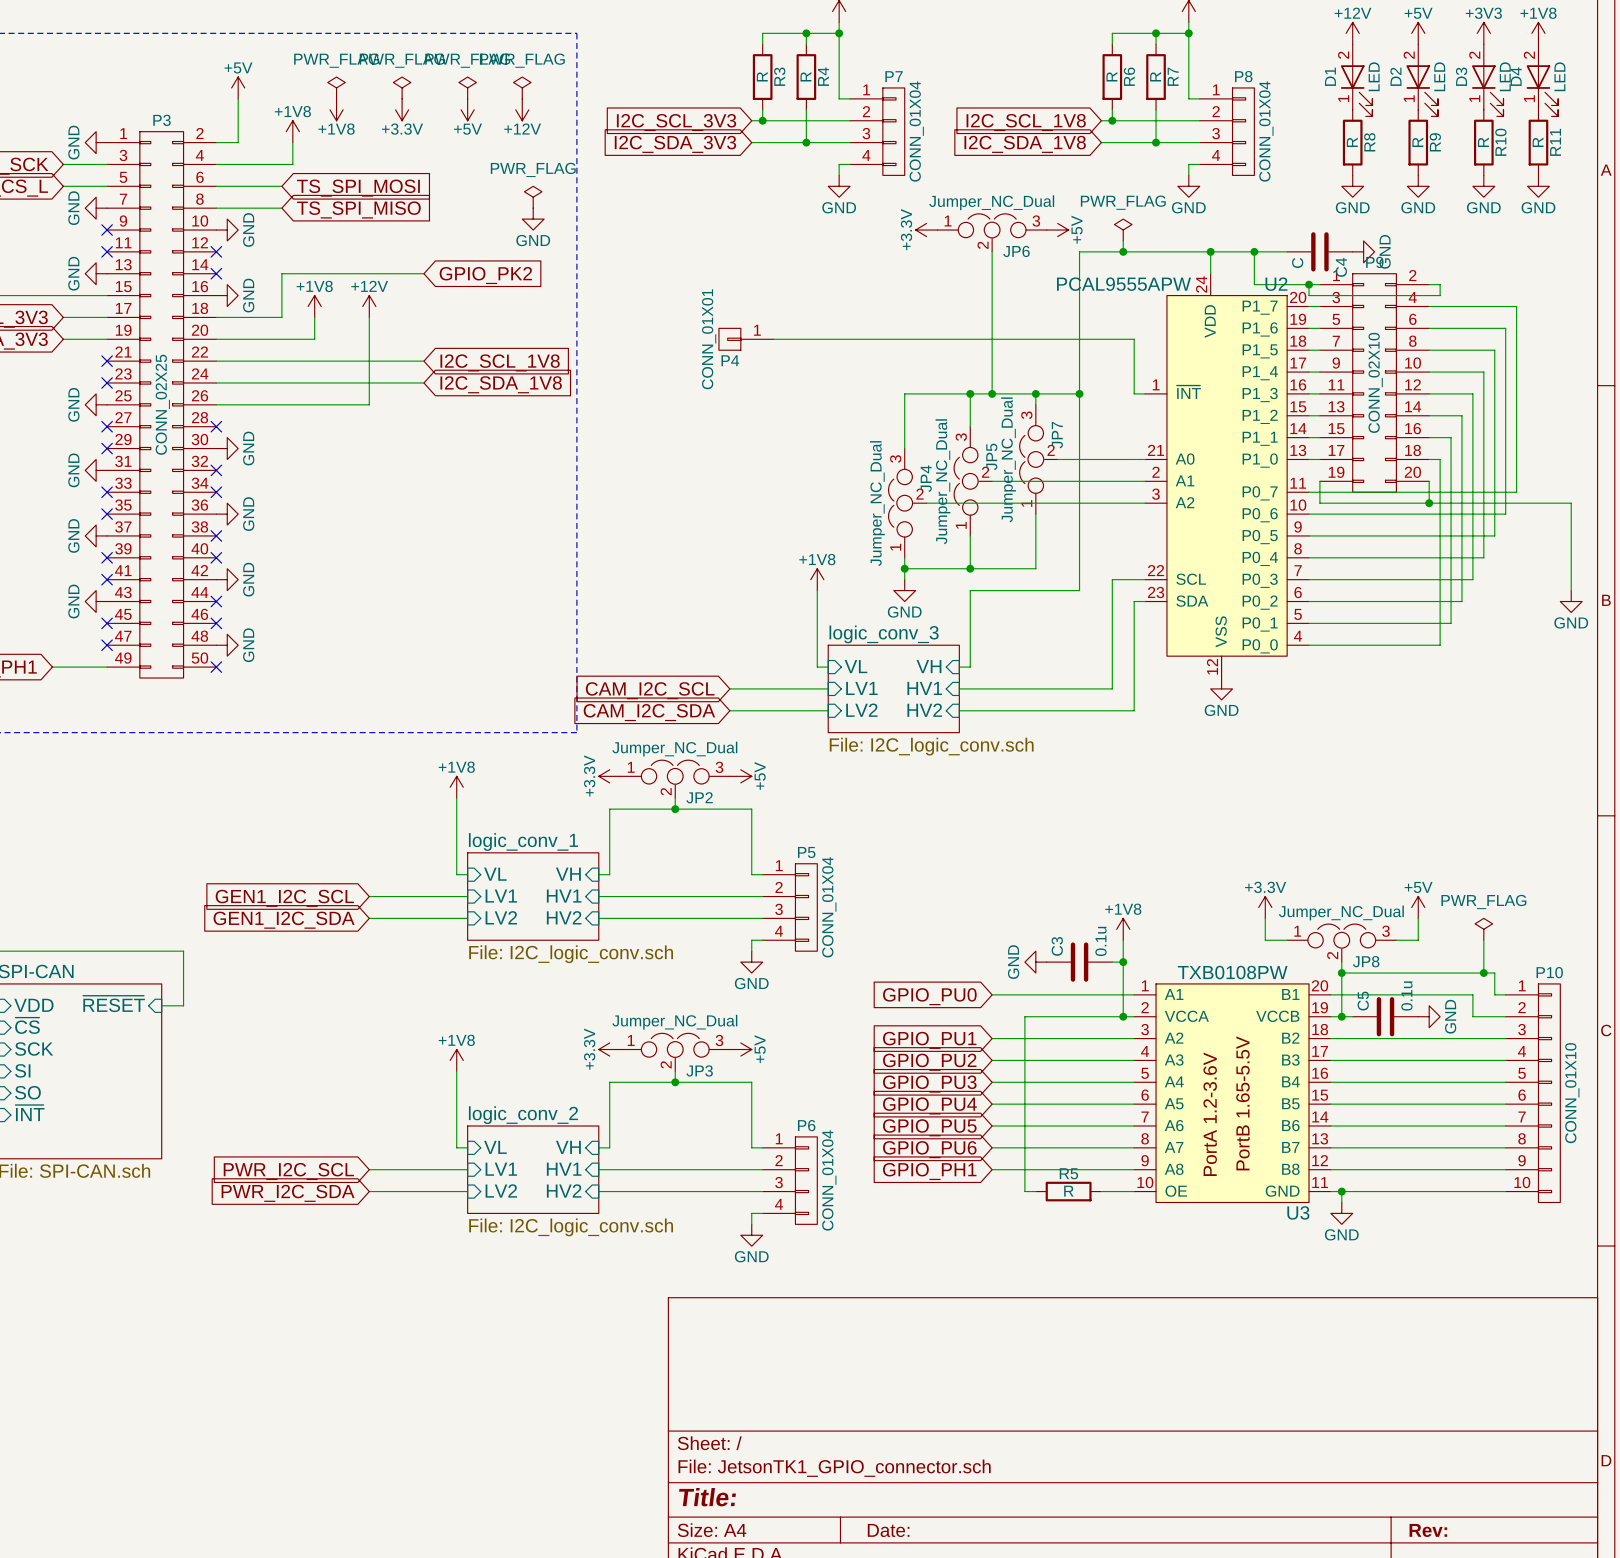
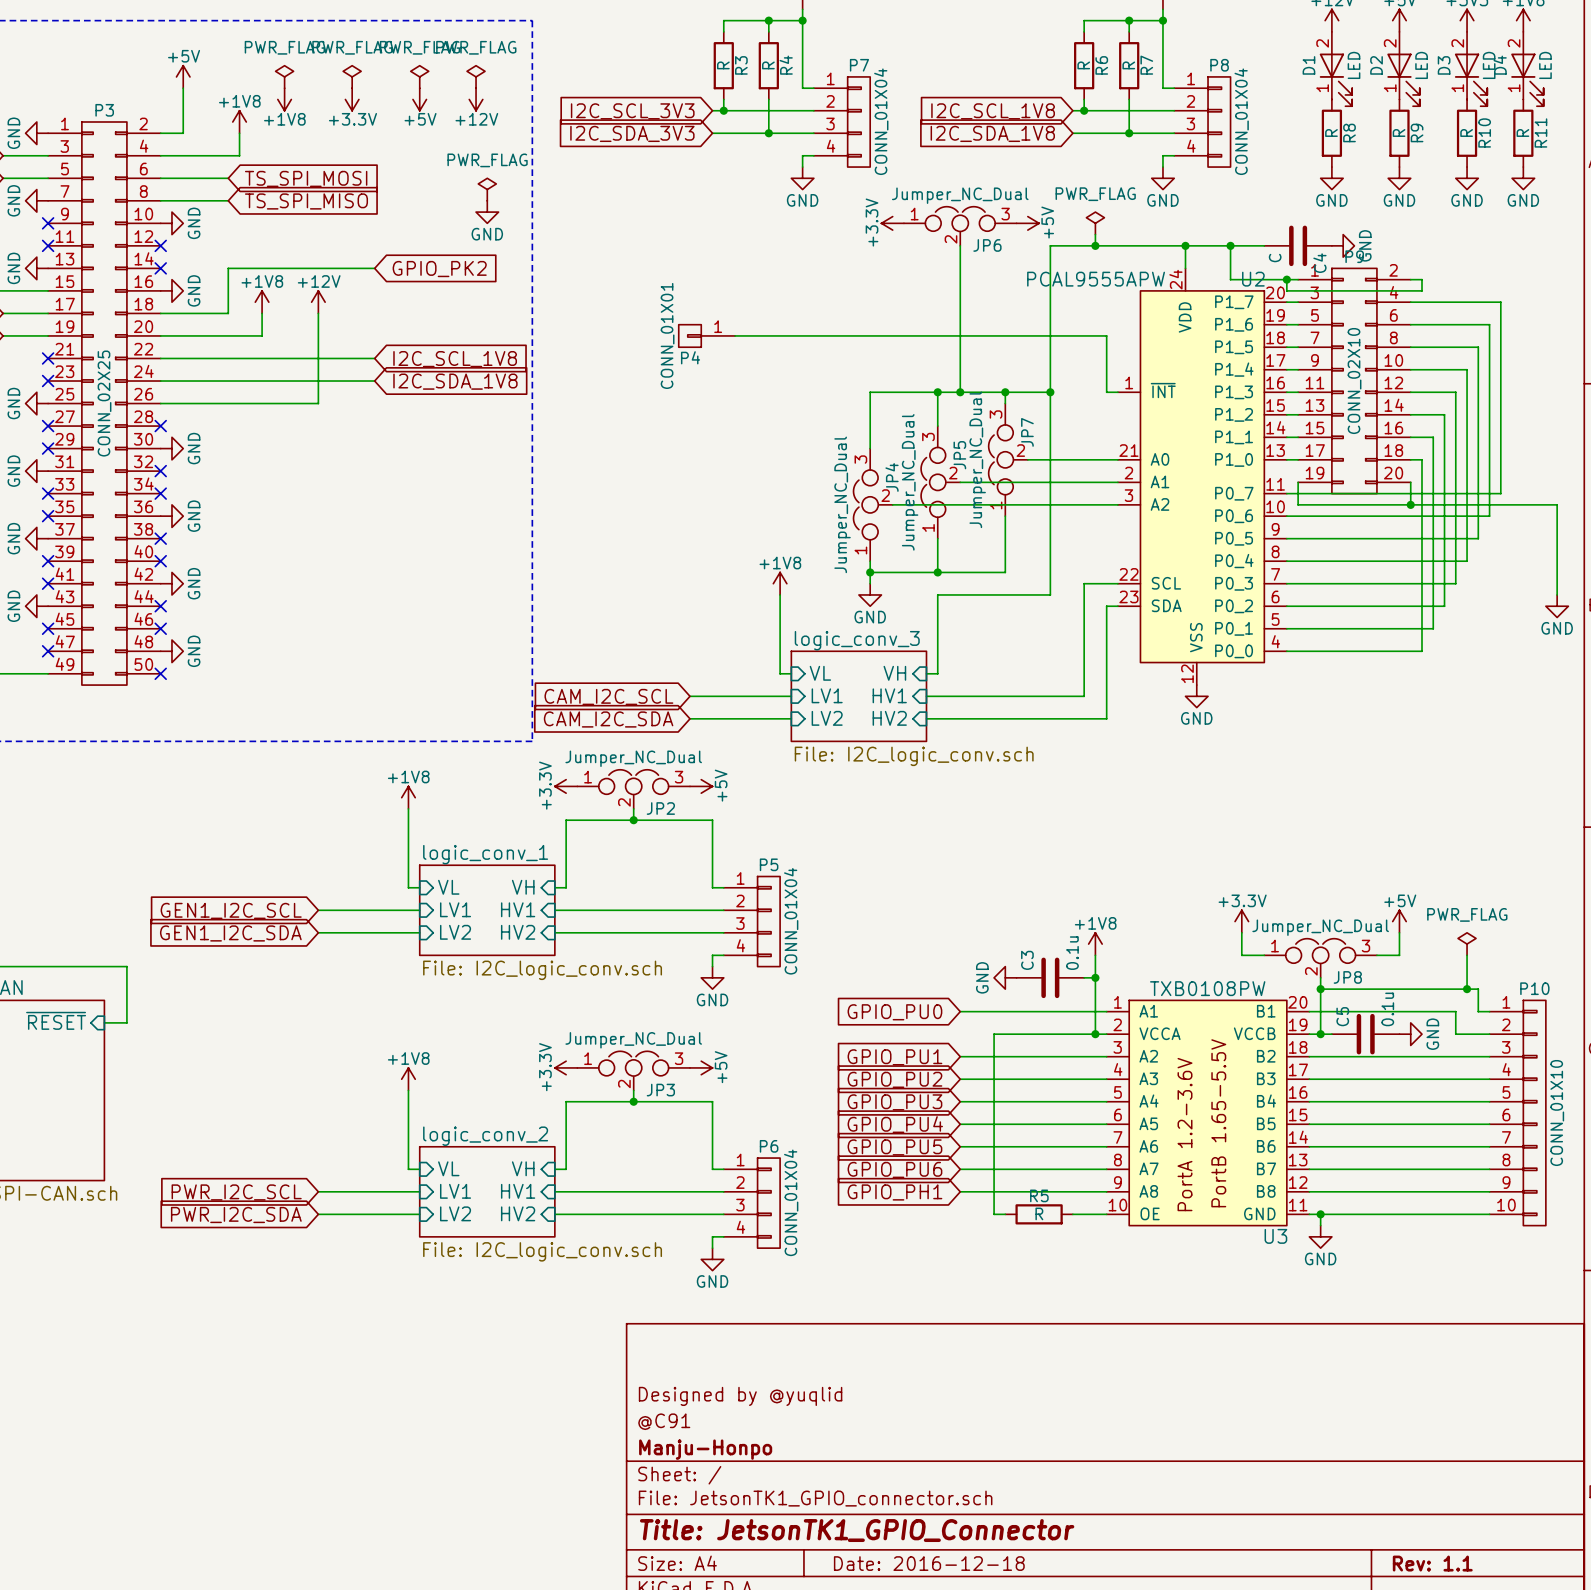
title block: none -> Designed by @yuqlid (740, 1396)
title block: none -> @C91 (664, 1421)
title block: none -> Manju-Honpo (705, 1449)
title block: Title: (707, 1497) -> Title: JetsonTK1_GPIO_Connector (857, 1530)
title block: Date: (888, 1530) -> Date: 2016-12-18 (929, 1563)
title block: Rev: (1428, 1530) -> Rev: 1.1 (1432, 1563)

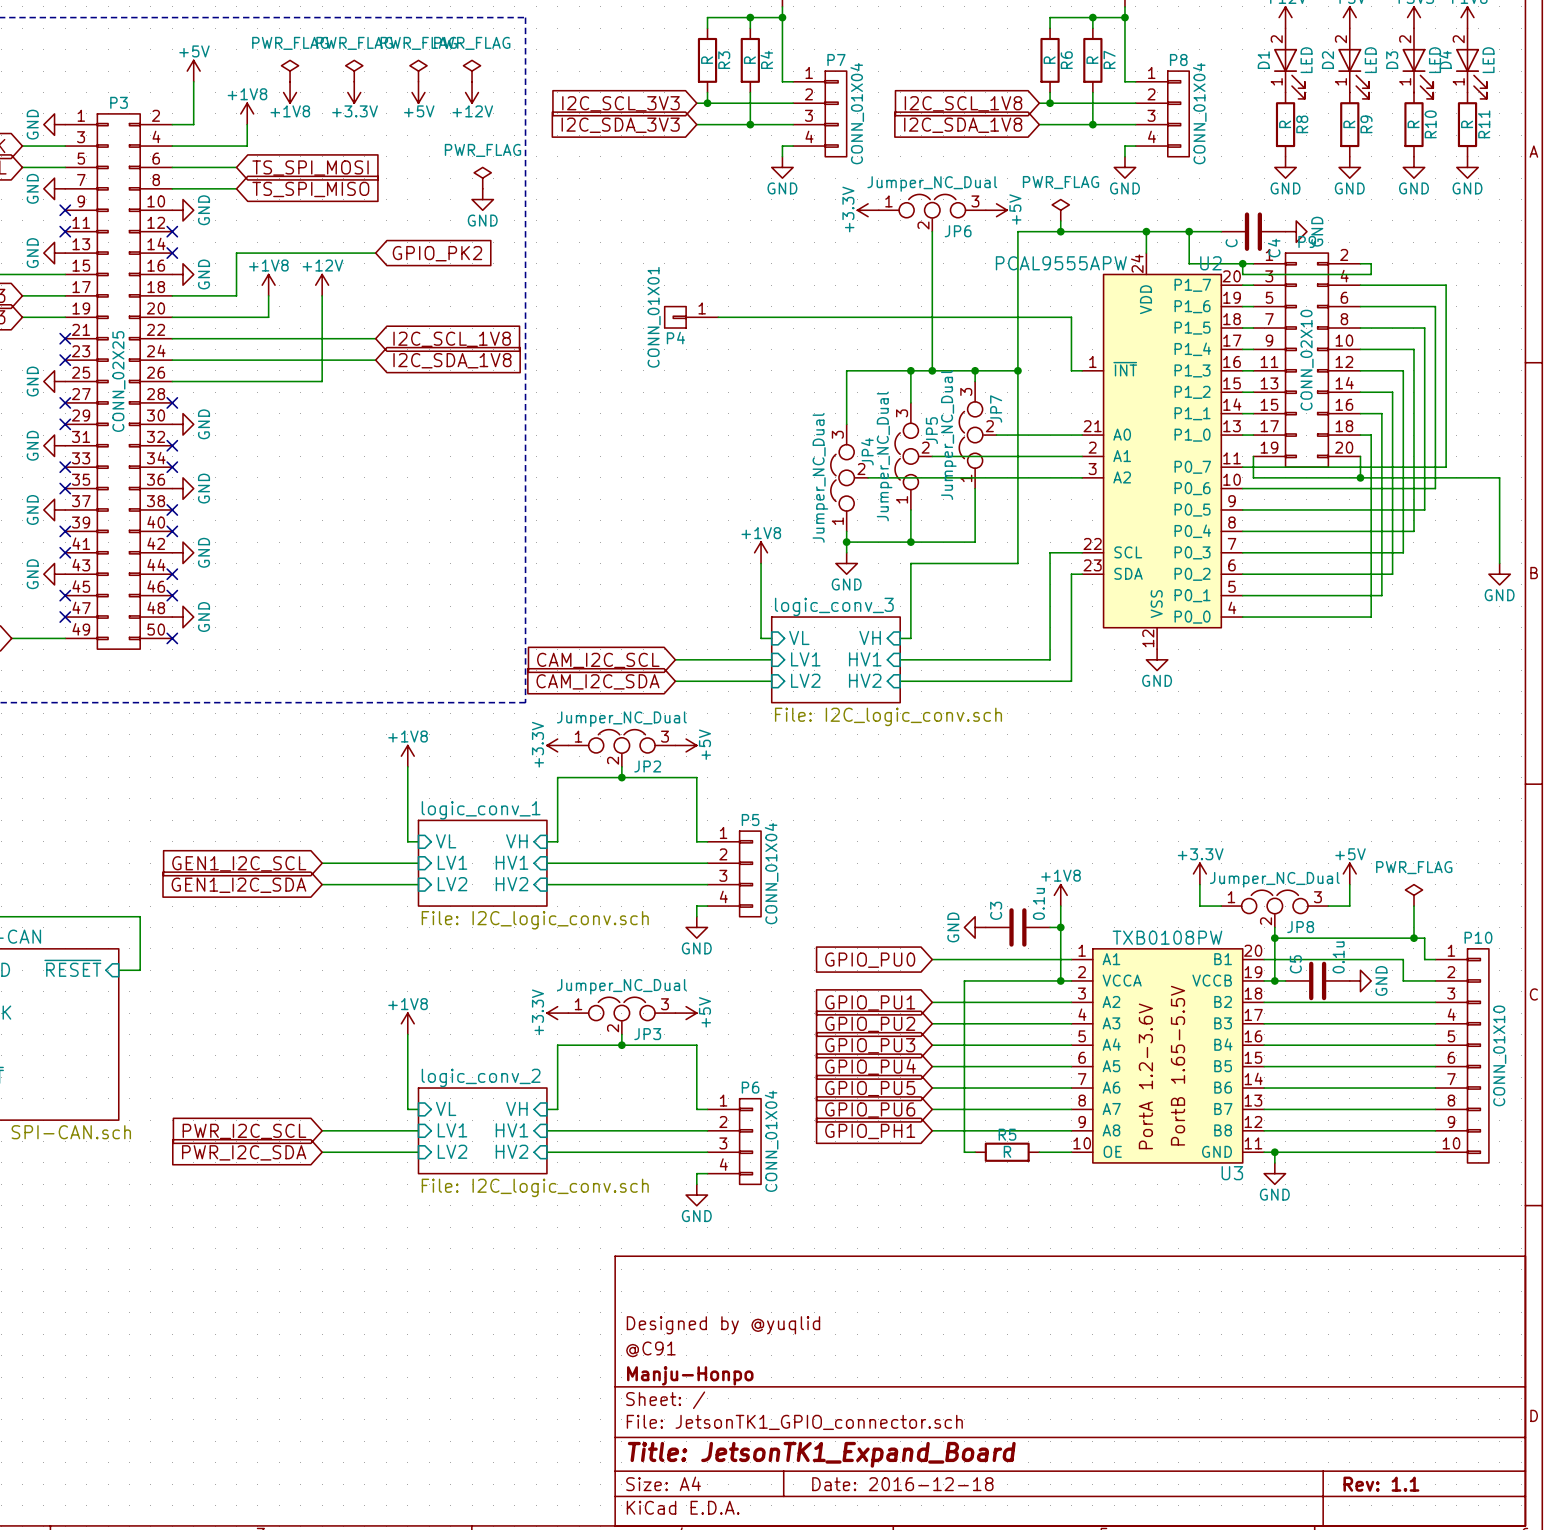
title block: Title: JetsonTK1_GPIO_Connector (857, 1530) -> Title: JetsonTK1_Expand_Board (821, 1454)

